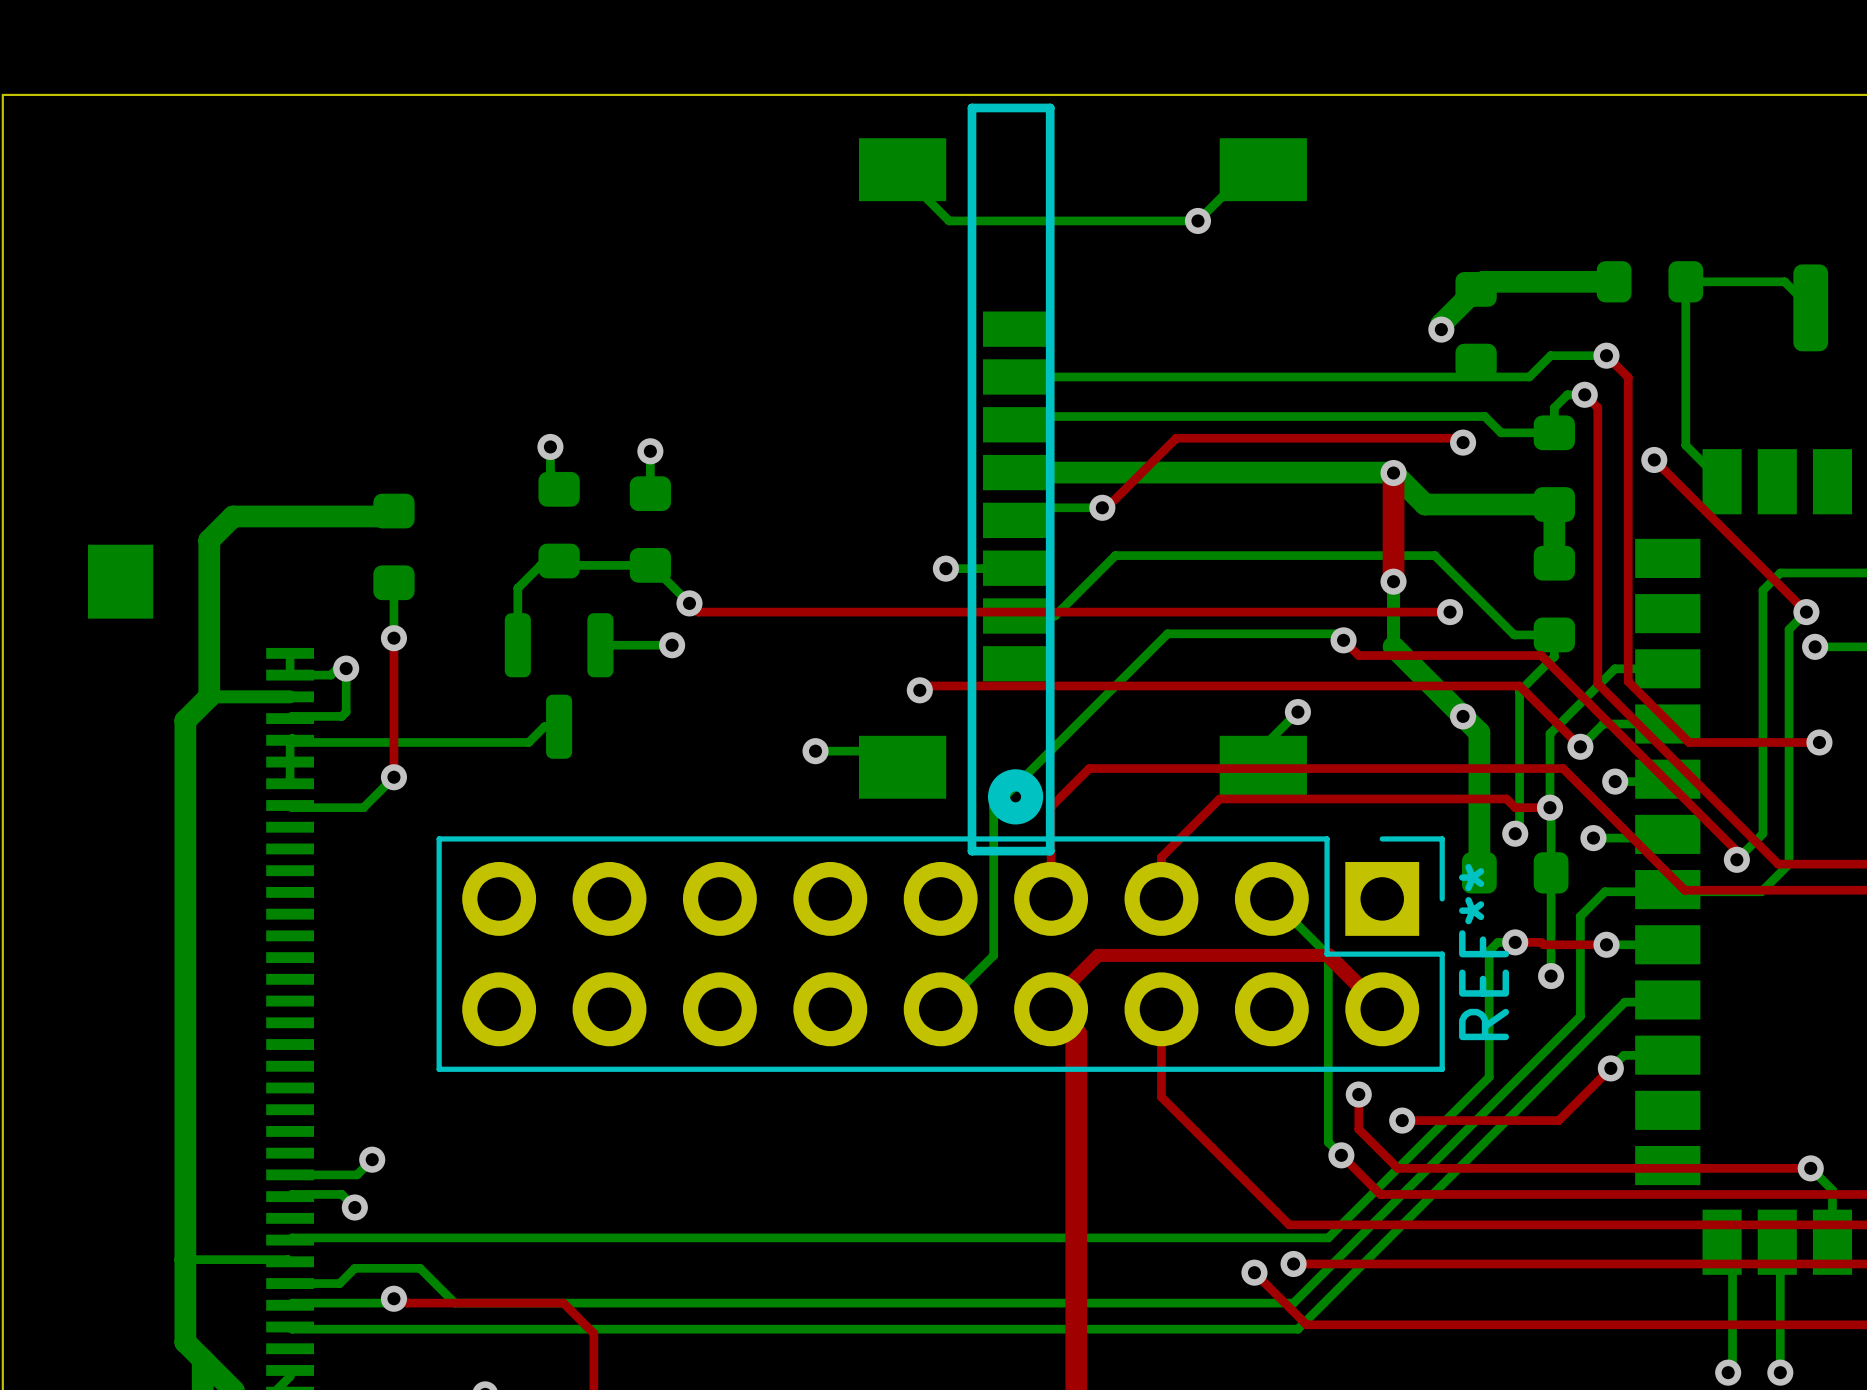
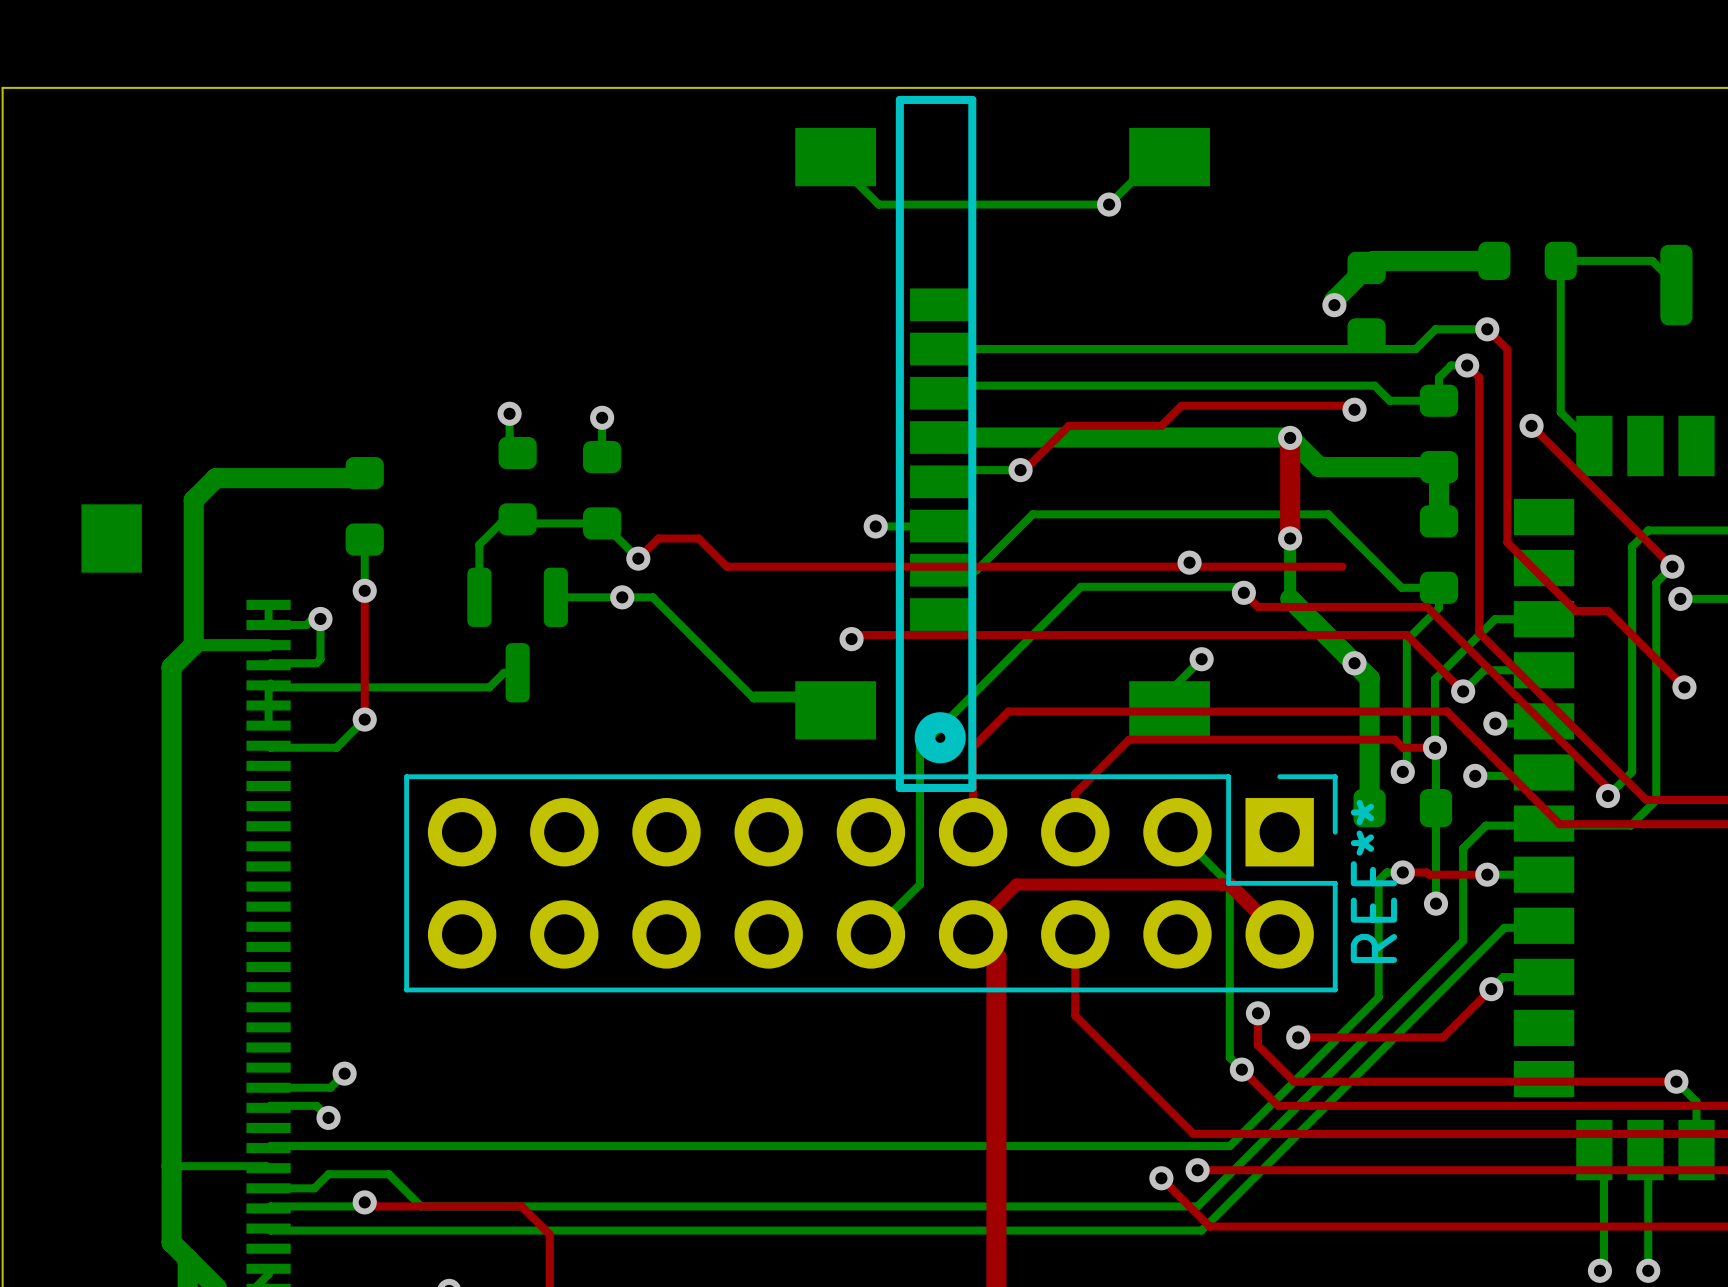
top track: (1276, 438) (1176, 438) (1154, 459) -> (1181, 405) (1161, 425) (1068, 425)
top track: (1628, 586) (1628, 681) (1689, 742) (1819, 742) -> (1507, 542) (1575, 610) (1608, 610) (1684, 687)
top track: (689, 603) (698, 612) (785, 612) -> (638, 558) (658, 538) (698, 538) (726, 566)
via position: (1450, 612) -> (1189, 562)
bottom track: none -> (622, 597) (652, 597) (754, 698) (819, 698)
via: (815, 751) -> none

